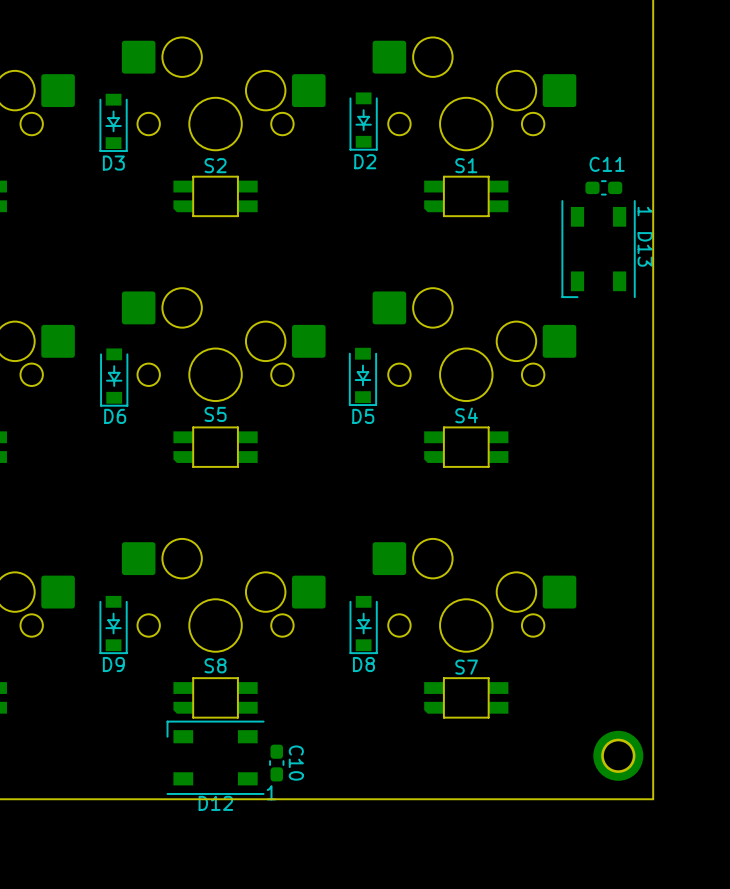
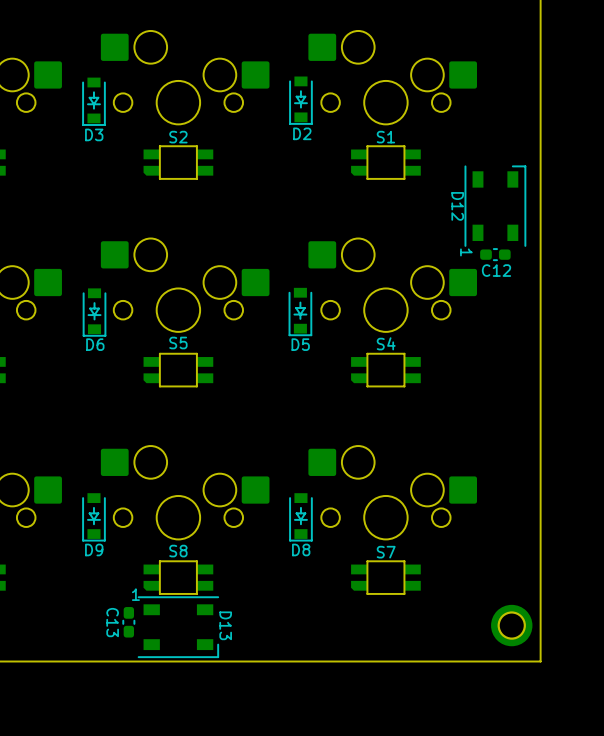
C11: (603, 187) -> none
D13 footprint: [561, 200, 636, 298] -> [137, 596, 219, 658]
C12: none -> (495, 254)
C13: none -> (128, 622)
D12 rotation: 0° (215, 757) -> 90° clockwise (495, 206)
D12 position: (215, 757) -> (495, 206)
C10: (276, 763) -> none

